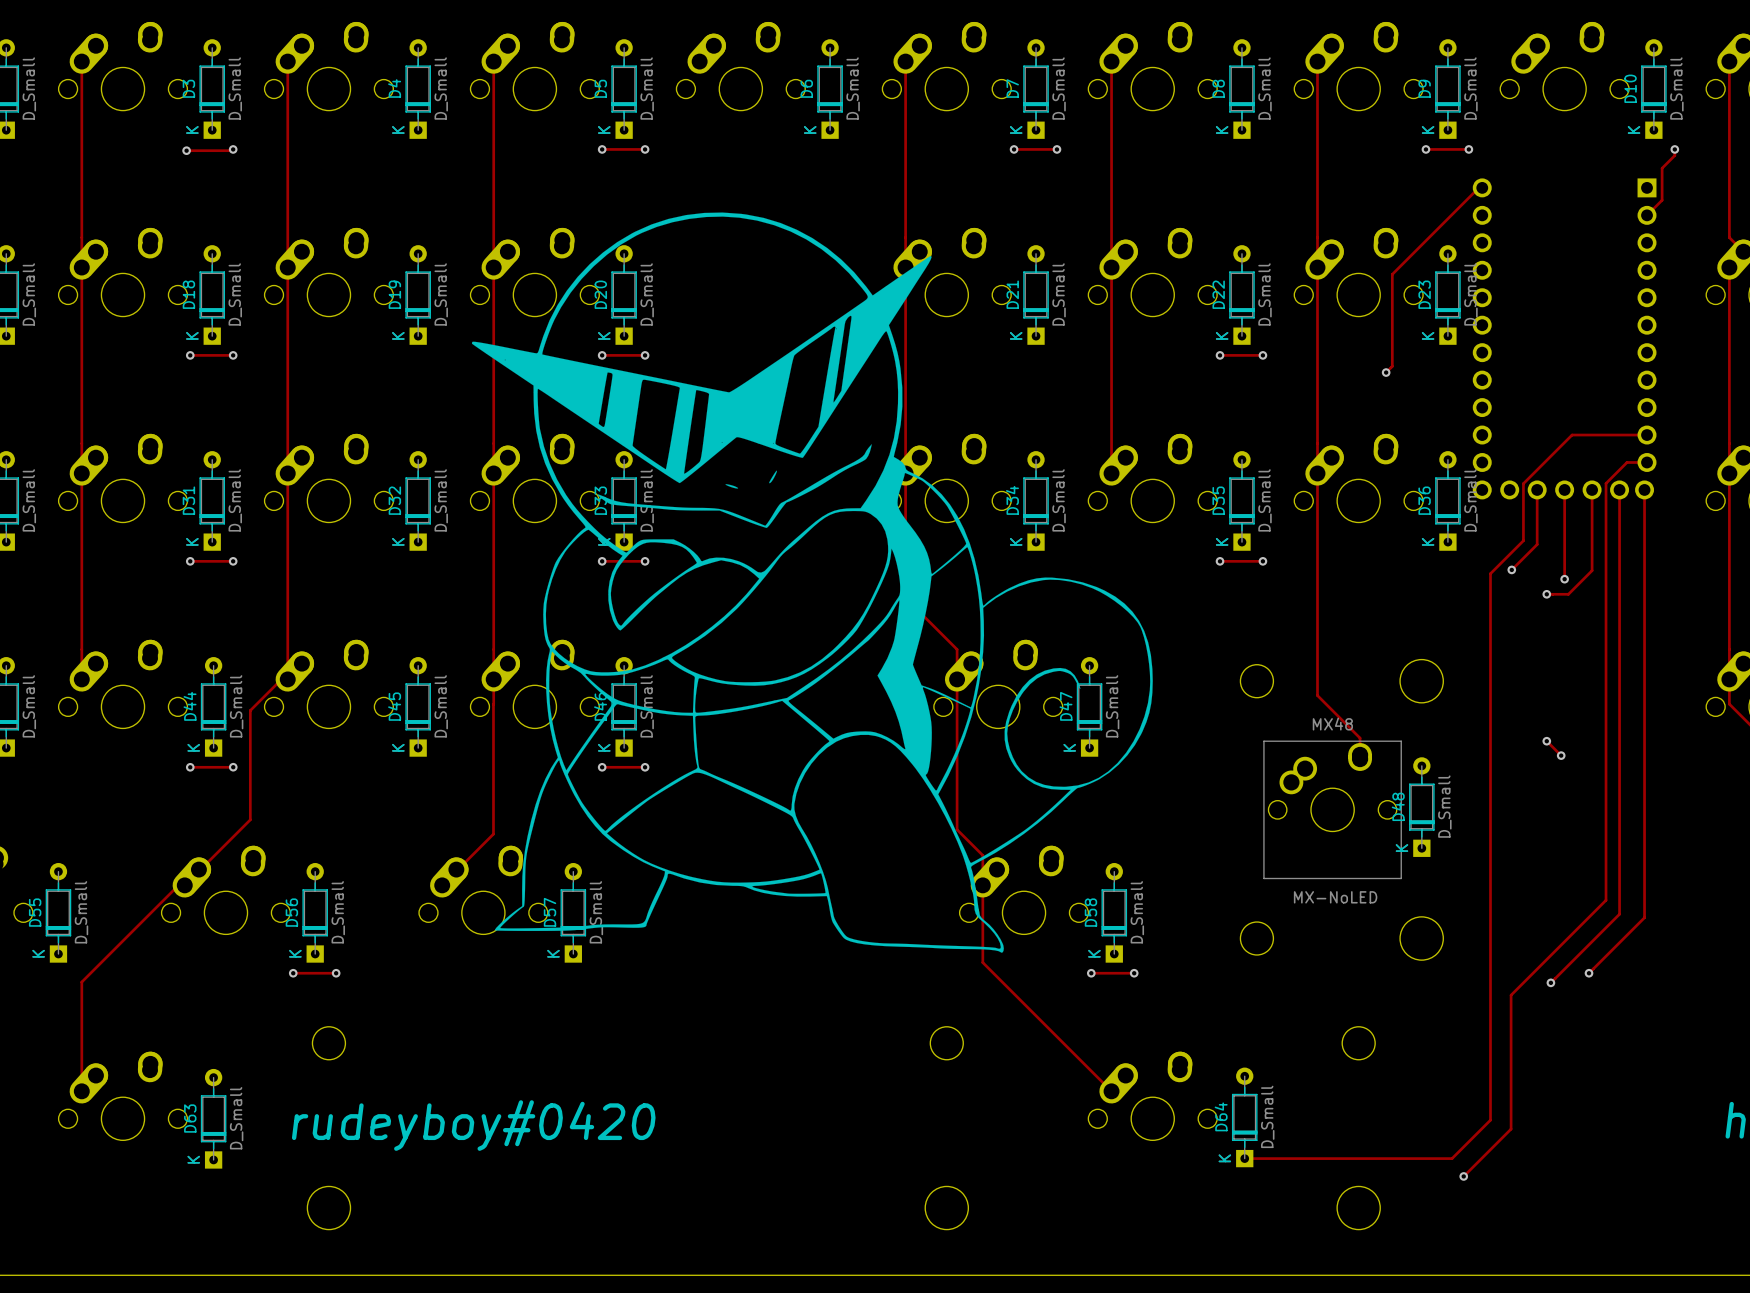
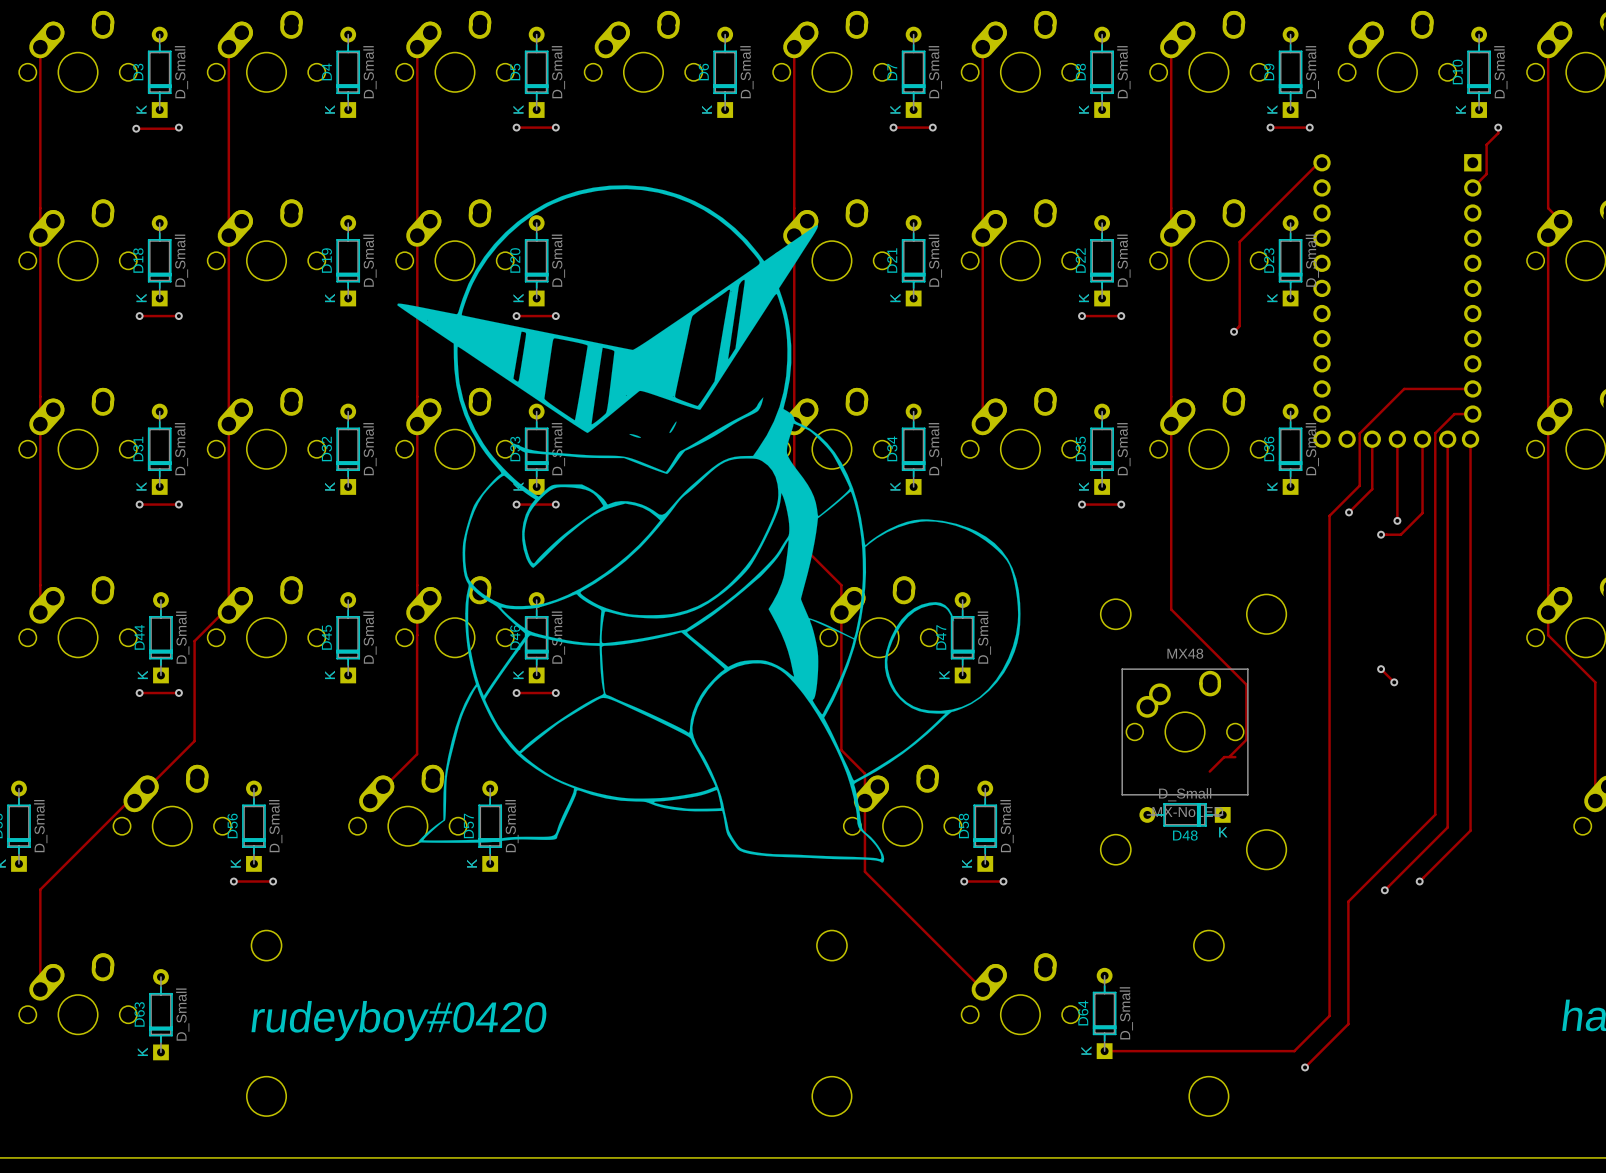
track: (1317, 675) (1317, 695) (1360, 738) (1360, 754) -> (1171, 609) (1246, 684) (1246, 739) (1229, 756)
D48 rotation: 0° (1421, 807) -> 90° counterclockwise (1185, 814)
D48 position: (1421, 807) -> (1185, 814)
track: none -> (1235, 757) (1224, 757) (1209, 771)

